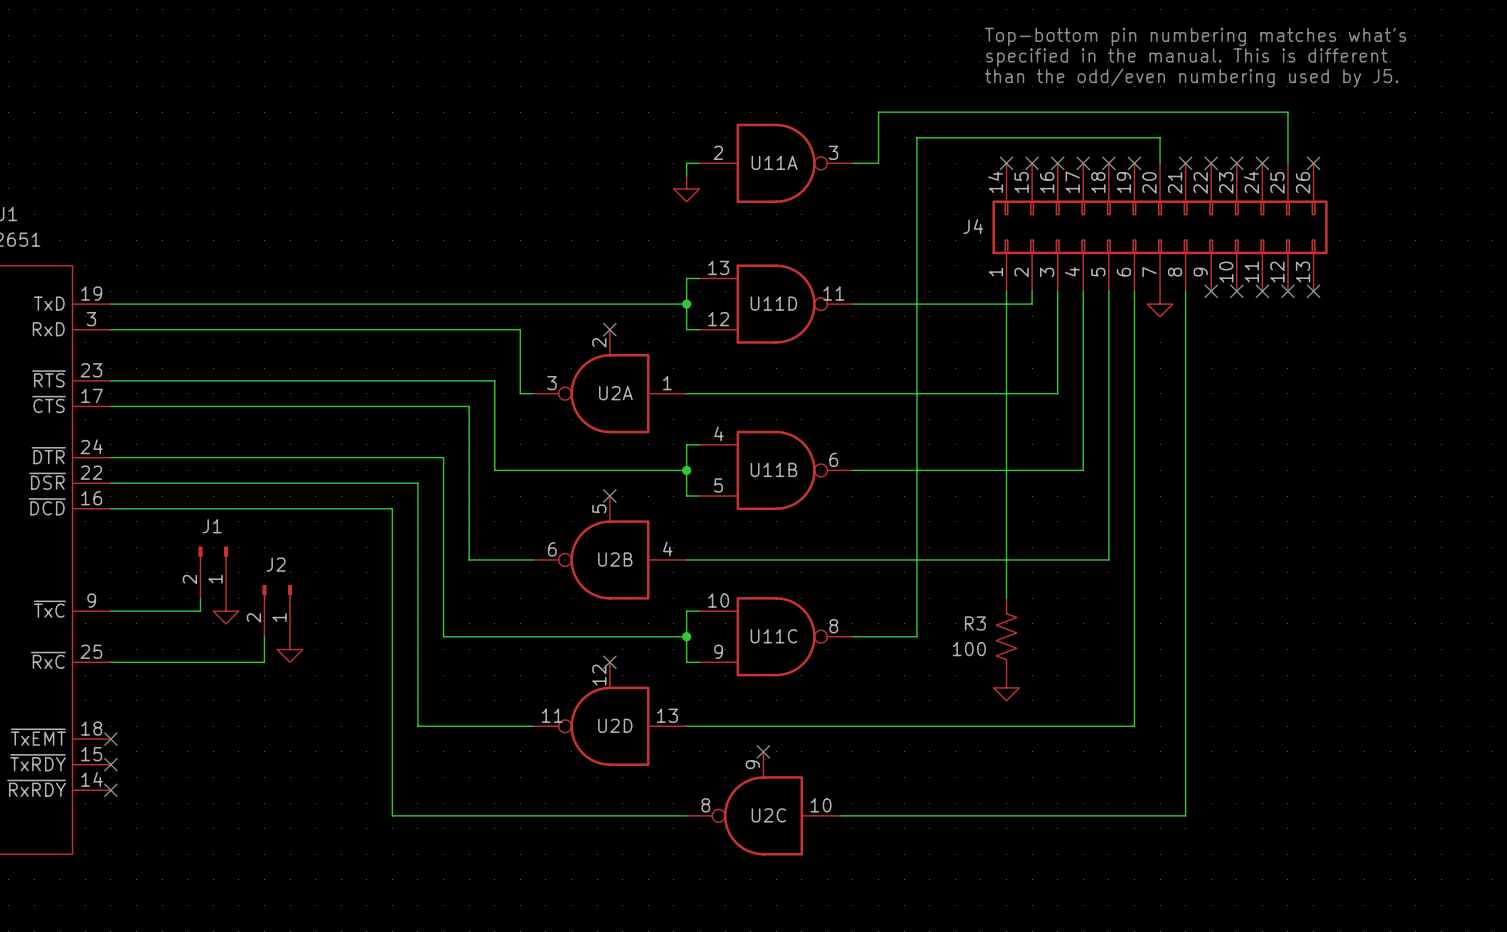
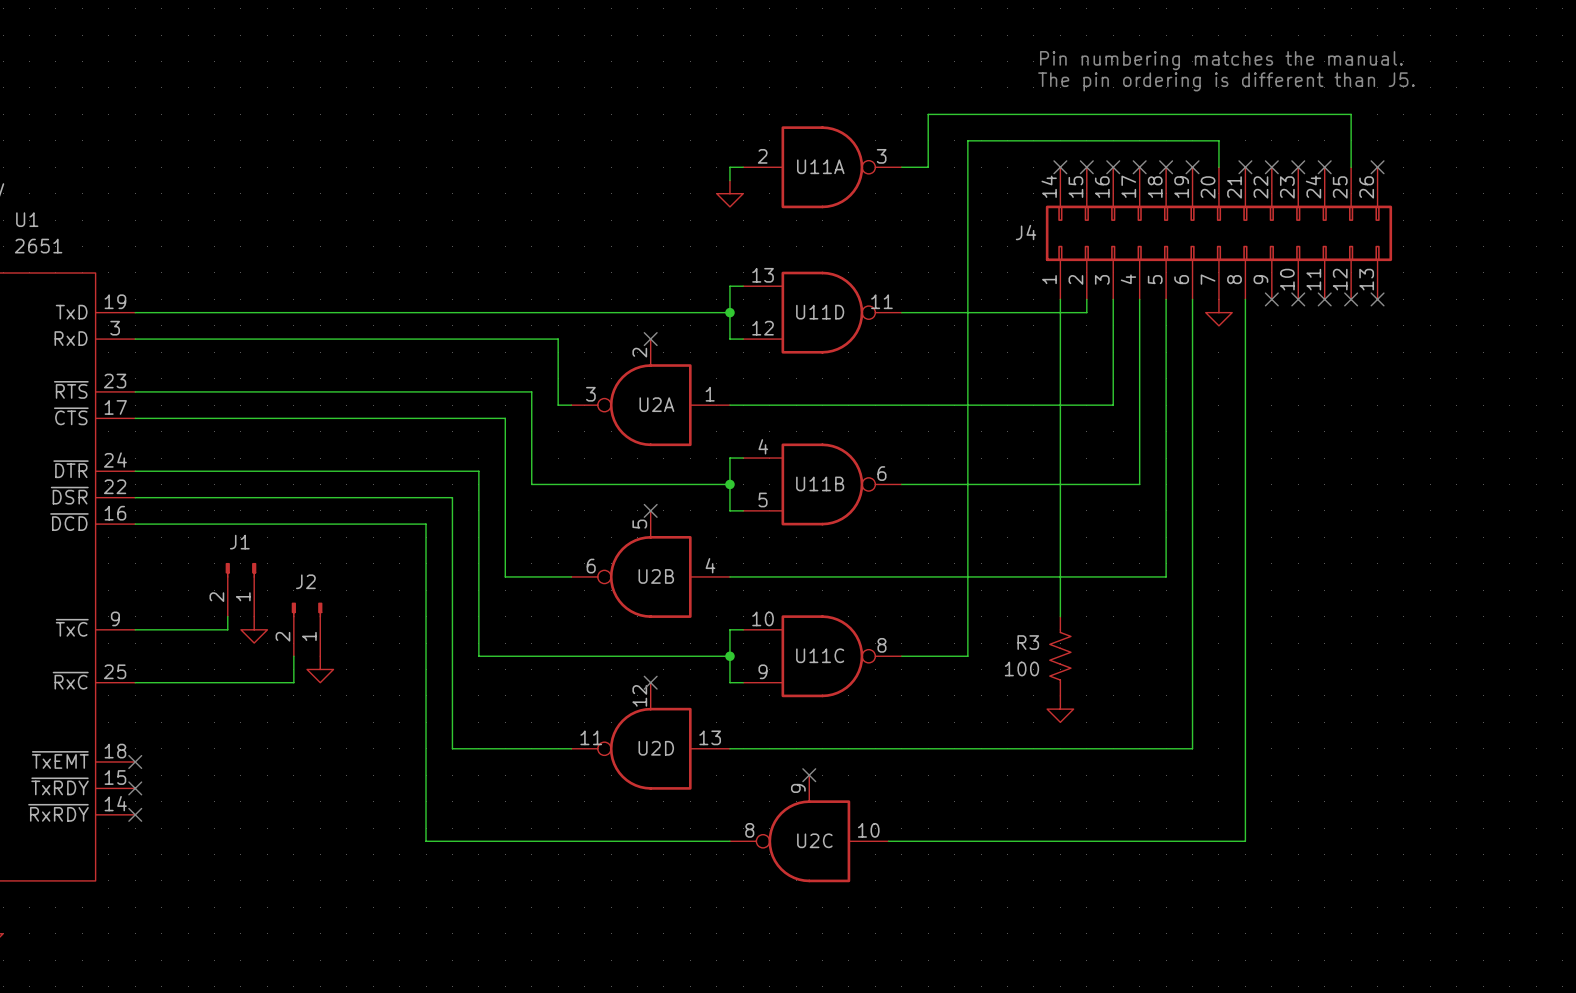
text: Top-bottom pin numbering matches what's (1195, 36) -> none
text: specified in the manual. This is different (1186, 57) -> Pin numbering matches the manual. (1221, 60)
text: than the odd/even numbering used by J5. (1191, 77) -> The pin ordering is different than J5. (1226, 81)

